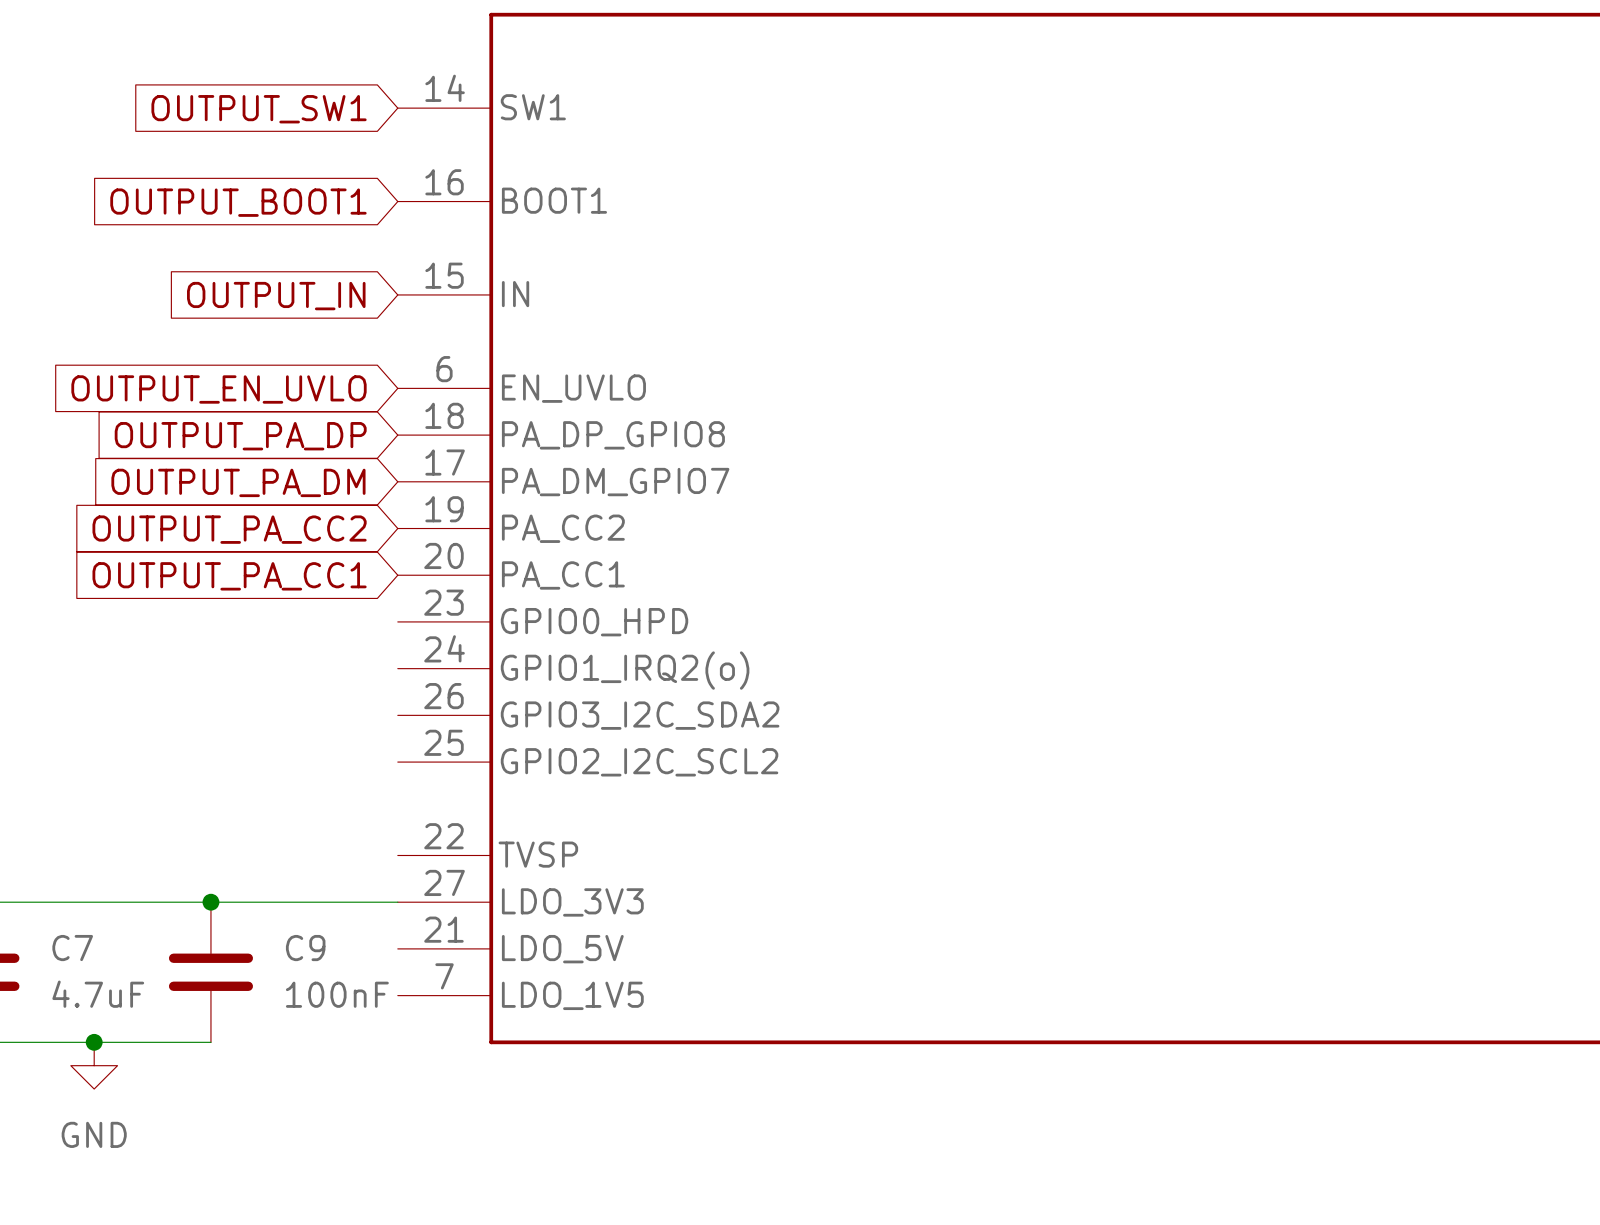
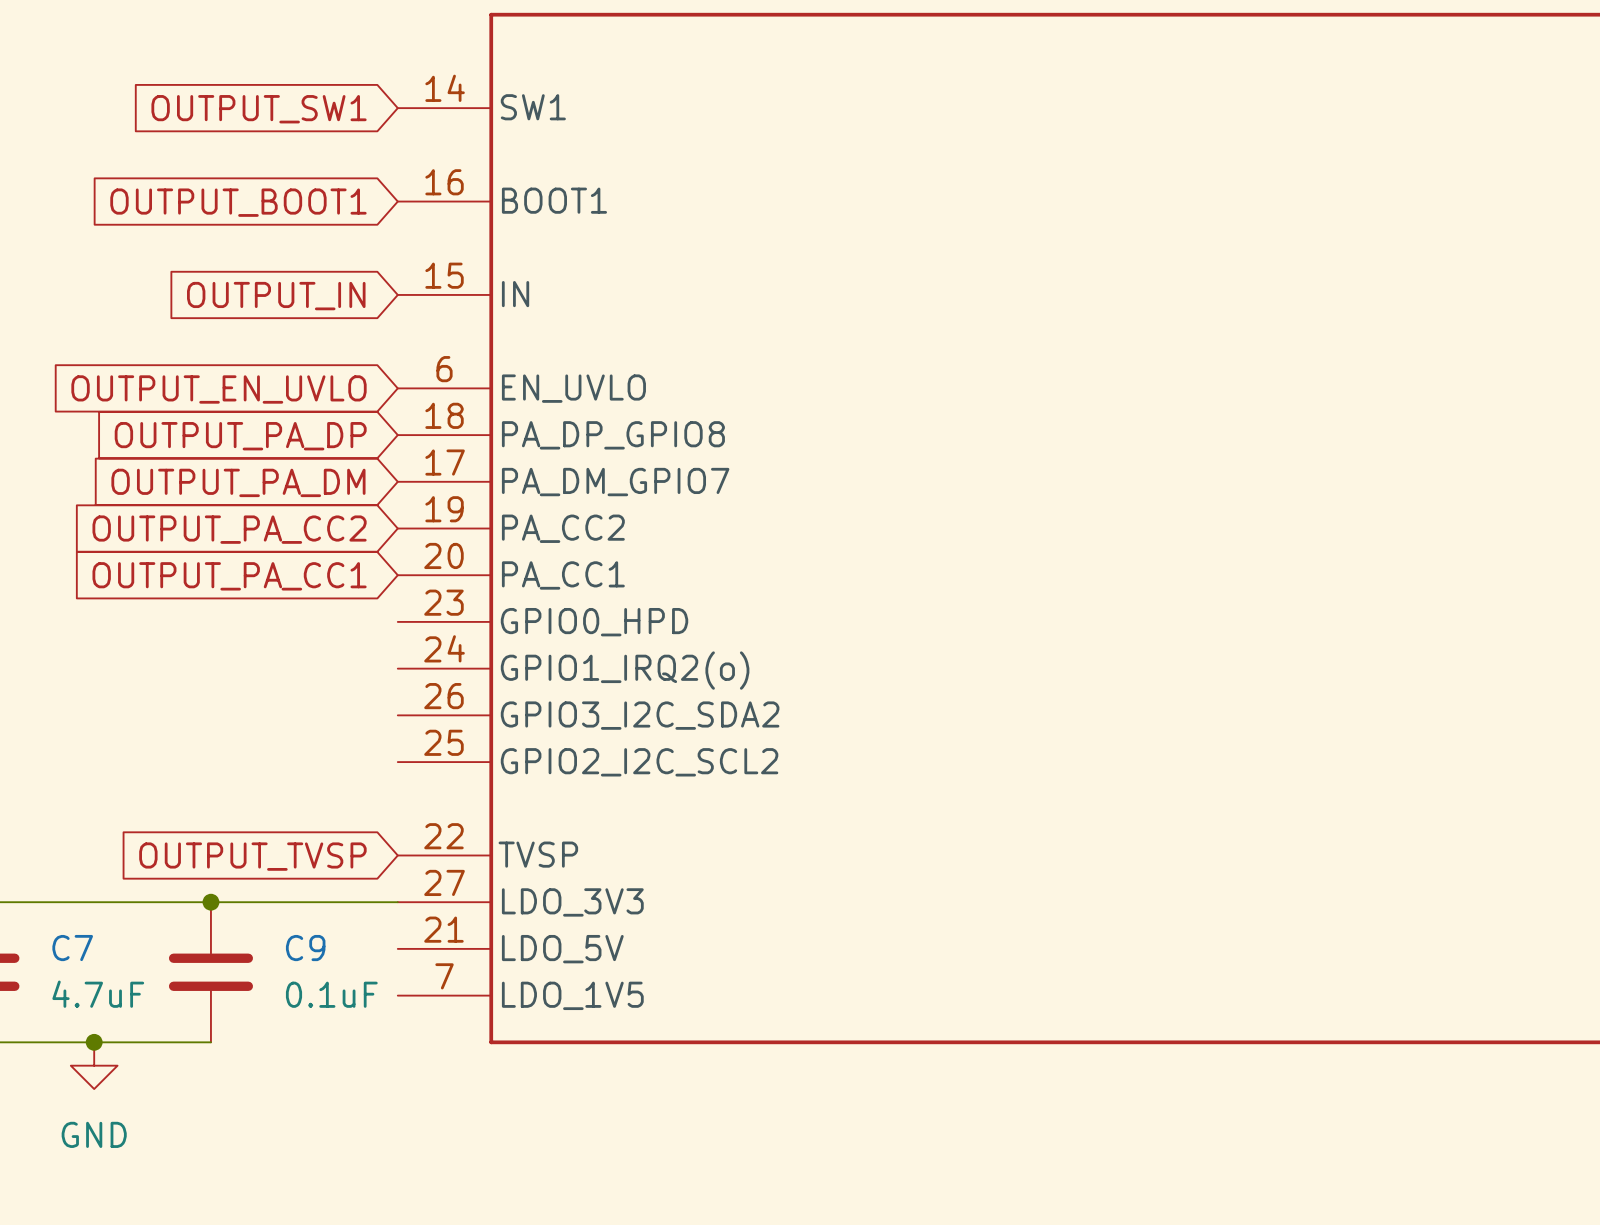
global label: none -> OUTPUT_TVSP (252, 856)
C9 value: 100nF (337, 994) -> 0.1uF (331, 994)

